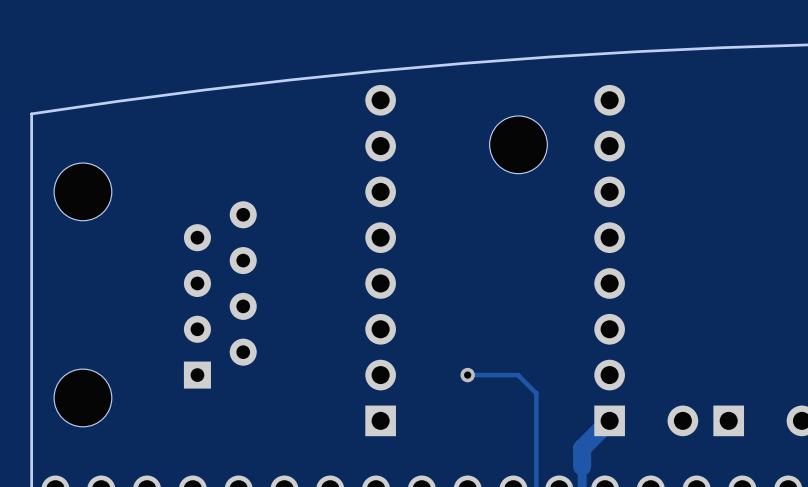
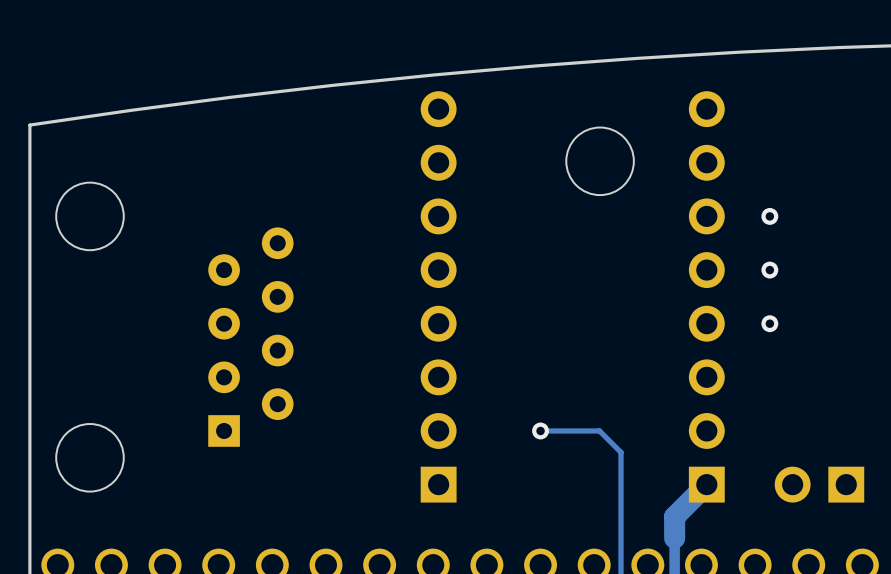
via: none -> (769, 216)
via: none -> (769, 270)
via: none -> (769, 323)

